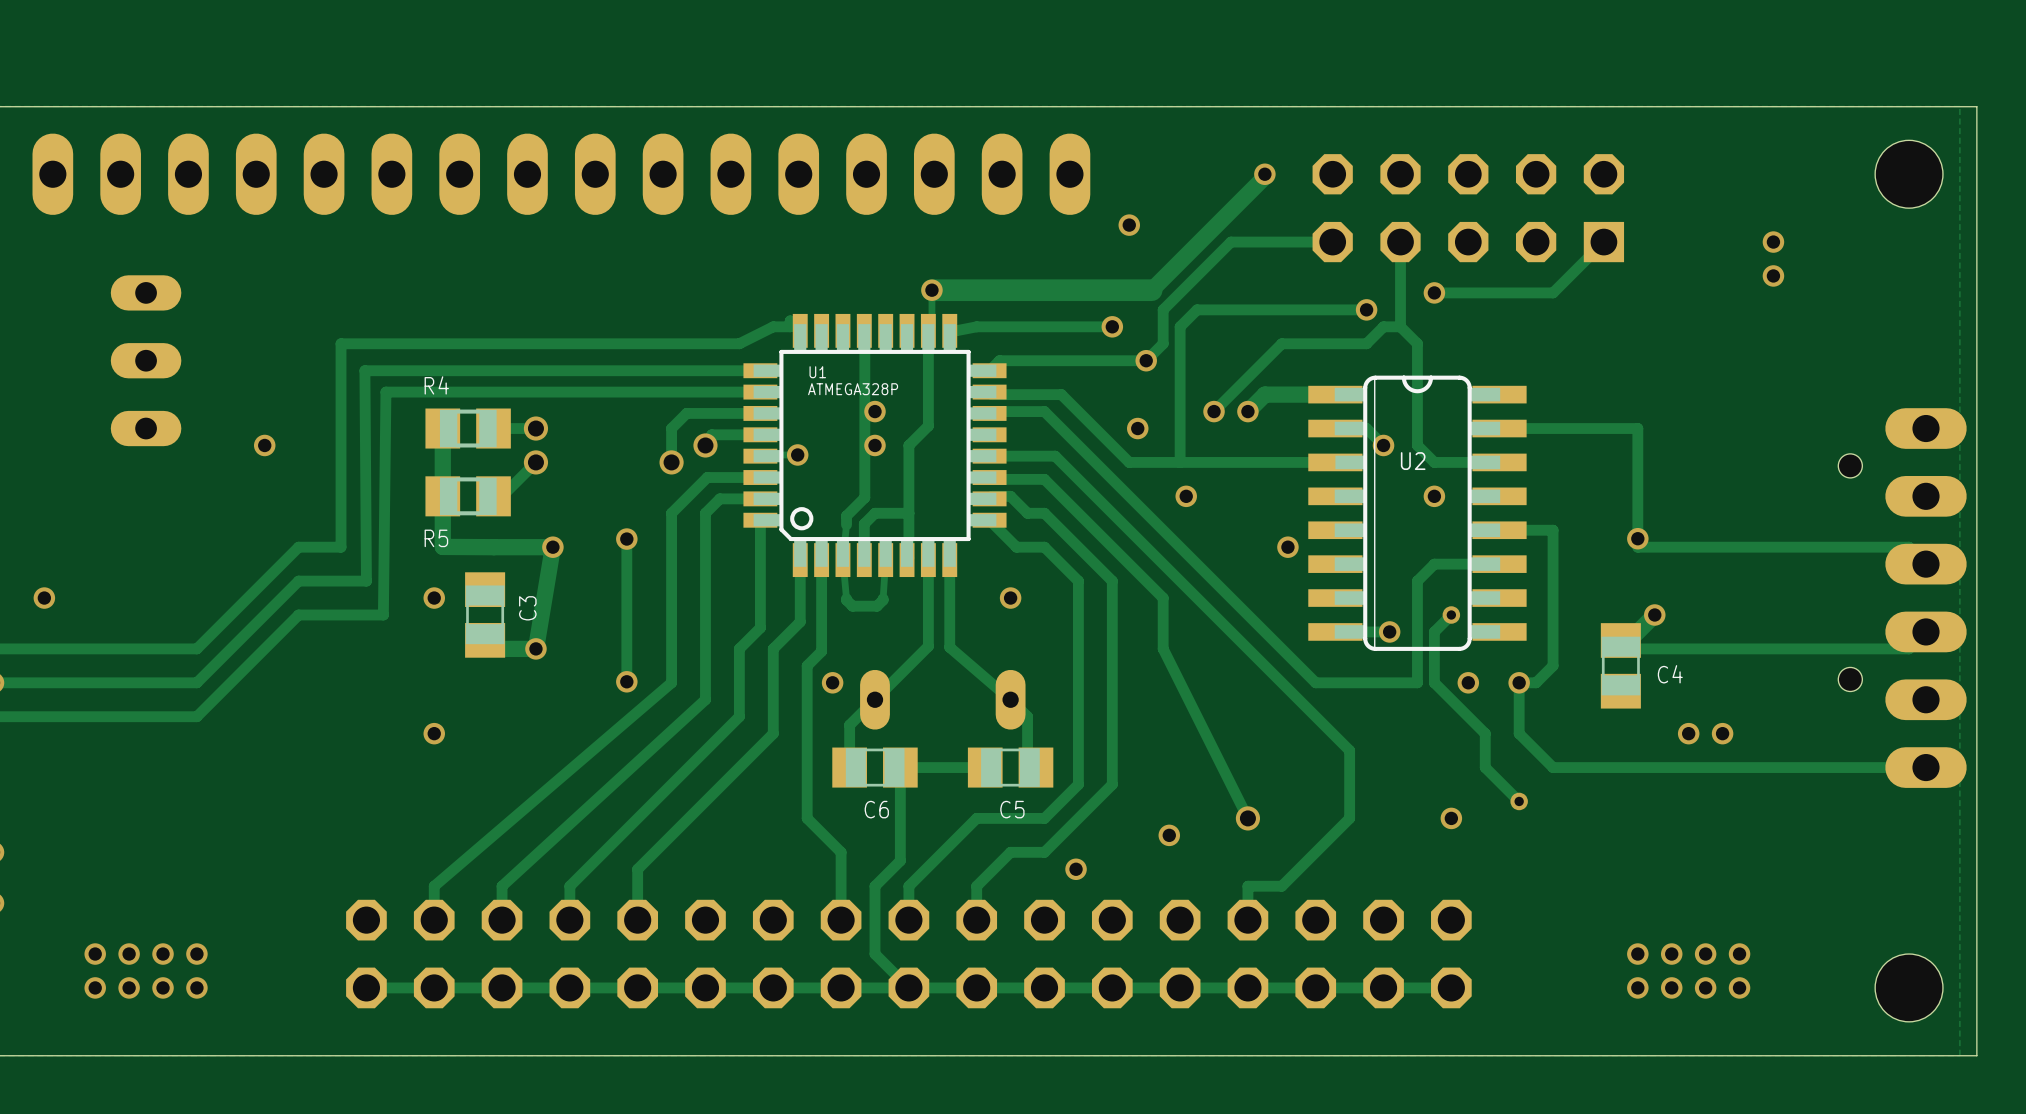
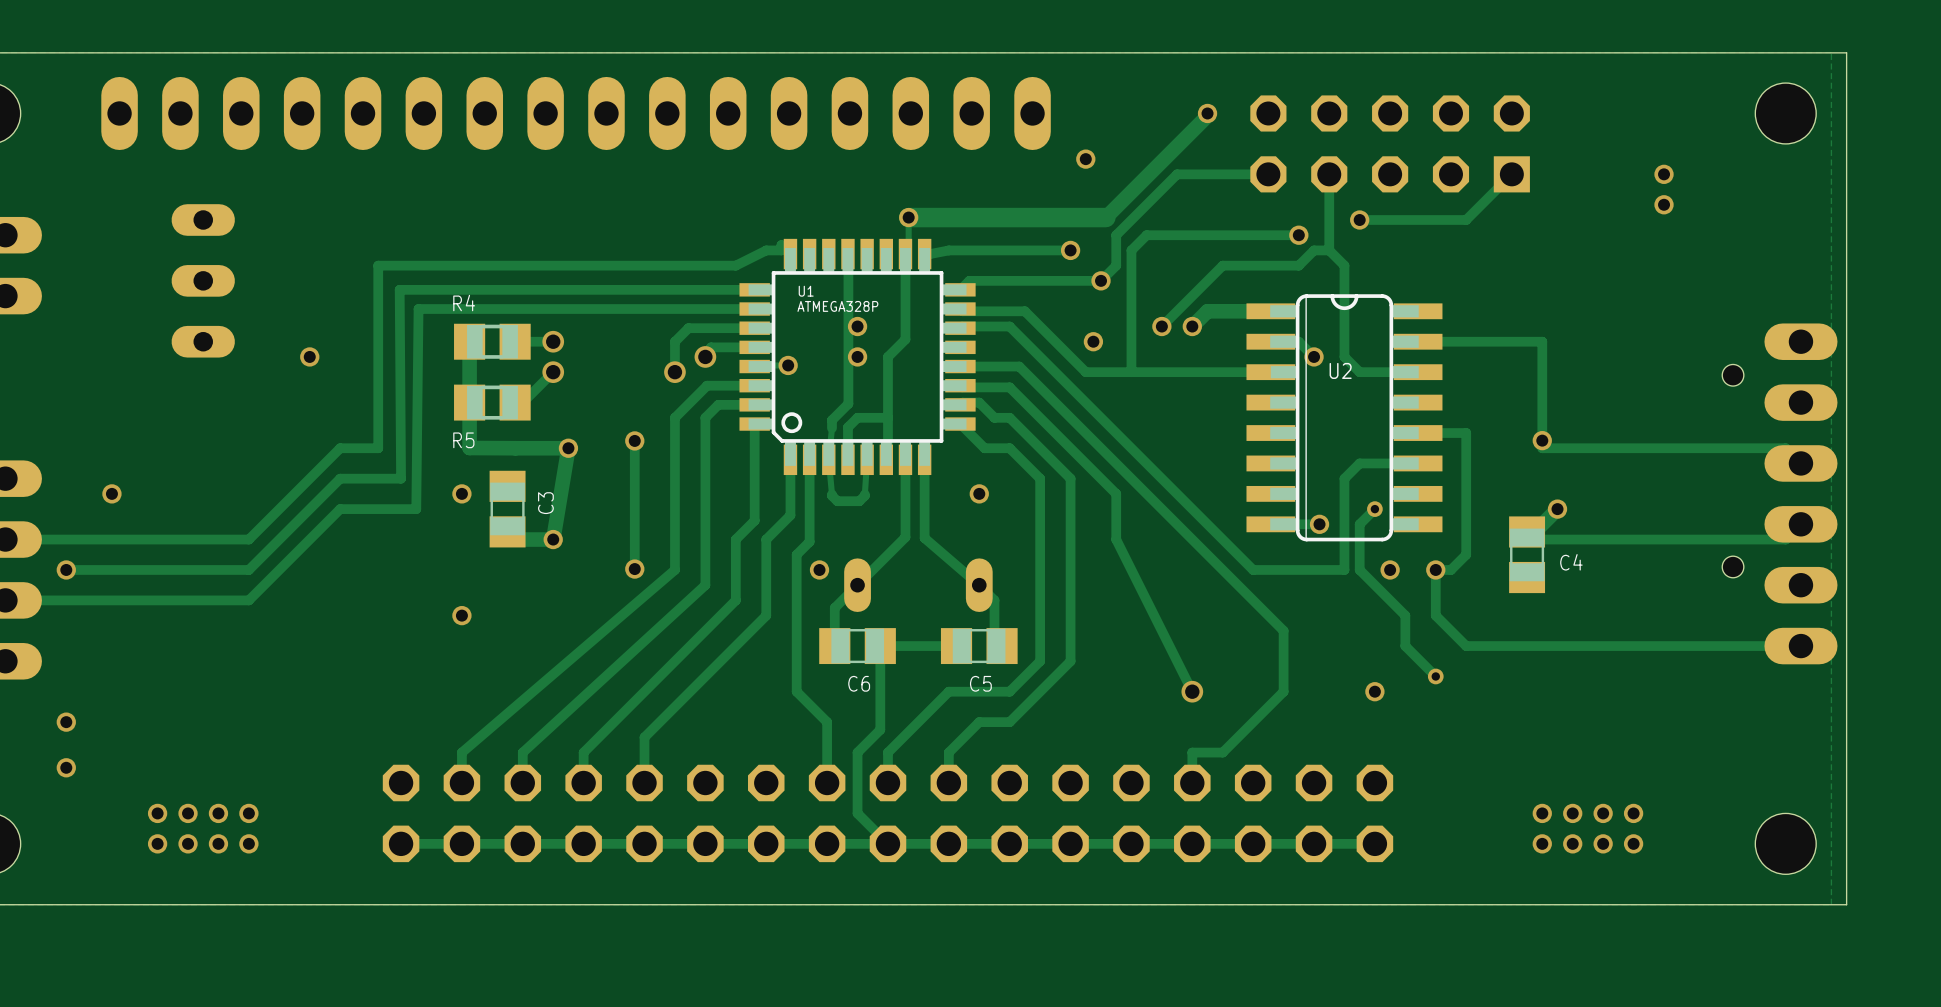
via: (1186, 496) -> none
via: (1434, 496) -> none
via: (1287, 547) -> none
via: (1688, 733) -> none
via: (1722, 733) -> none
via: (1169, 835) -> none
via: (1076, 869) -> none

